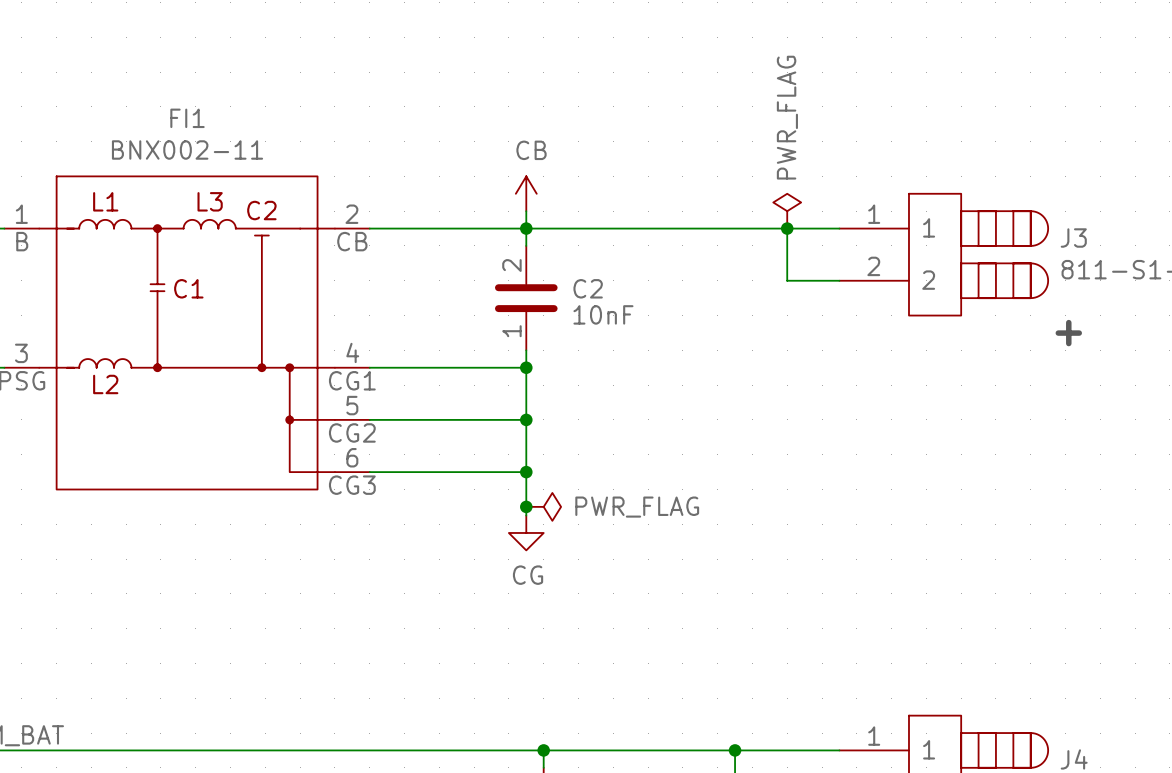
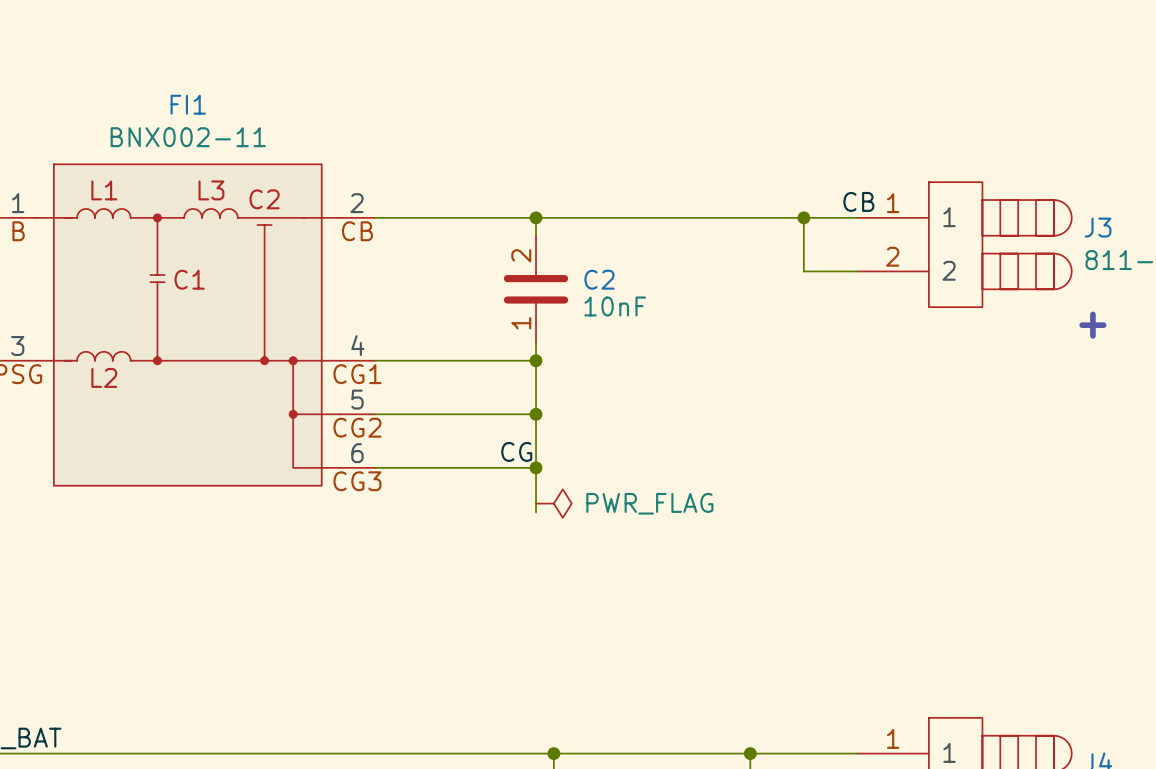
power symbol: CB (526, 193) -> none
wire: (526, 211) (526, 228) -> none
power symbol: PWR_FLAG (787, 211) -> none
label: none -> CB (858, 201)
label: none -> CG (516, 451)
junction: (526, 506) -> none
power symbol: CG (526, 532) -> none

